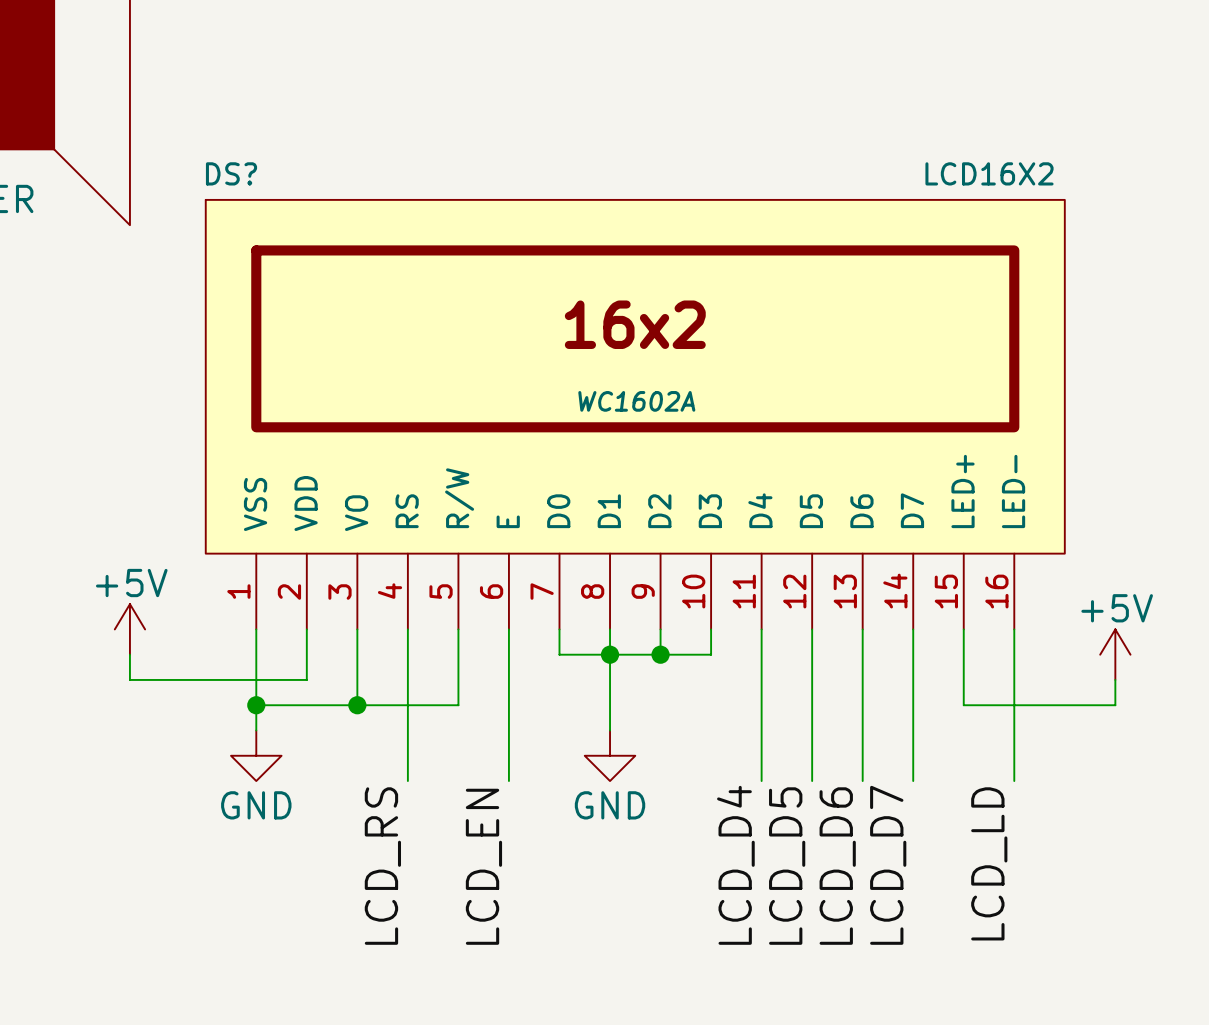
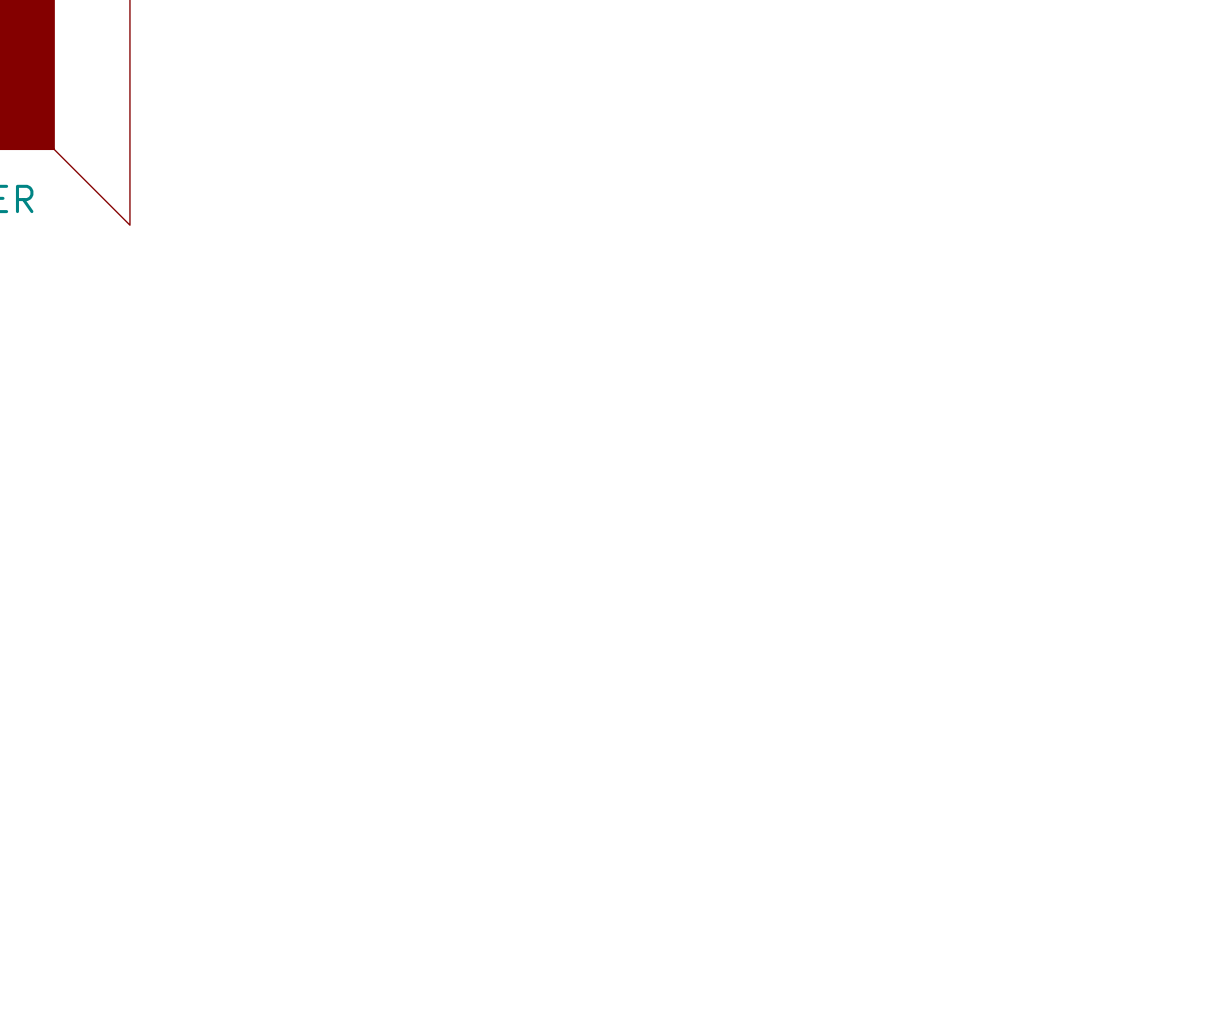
DS?: LCD16X2 (635, 414) -> none
power symbol: +5V (129, 629) -> none
wire: (256, 629) (256, 730) -> none
wire: (306, 629) (306, 679) (129, 679) (129, 654) -> none
wire: (357, 629) (357, 705) -> none
wire: (407, 629) (407, 781) -> none
wire: (458, 629) (458, 705) (256, 705) -> none
wire: (508, 629) (508, 781) -> none
wire: (559, 629) (559, 654) (711, 654) (711, 629) -> none
wire: (610, 629) (610, 730) -> none
wire: (660, 629) (660, 654) -> none
wire: (761, 629) (761, 781) -> none
wire: (812, 629) (812, 781) -> none
wire: (862, 629) (862, 781) -> none
wire: (913, 629) (913, 781) -> none
wire: (963, 629) (963, 705) (1115, 705) (1115, 679) -> none
wire: (1014, 629) (1014, 781) -> none
junction: (610, 654) -> none
junction: (660, 654) -> none
power symbol: +5V (1115, 654) -> none
junction: (256, 705) -> none
junction: (357, 705) -> none
power symbol: GND (256, 755) -> none
power symbol: GND (610, 755) -> none
label: LCD_LD (989, 863) -> none
label: LCD_D4 (735, 865) -> none
label: LCD_D7 (888, 865) -> none
label: LCD_RS (382, 866) -> none
label: LCD_EN (483, 866) -> none
label: LCD_D5 (787, 866) -> none
label: LCD_D6 (837, 866) -> none

